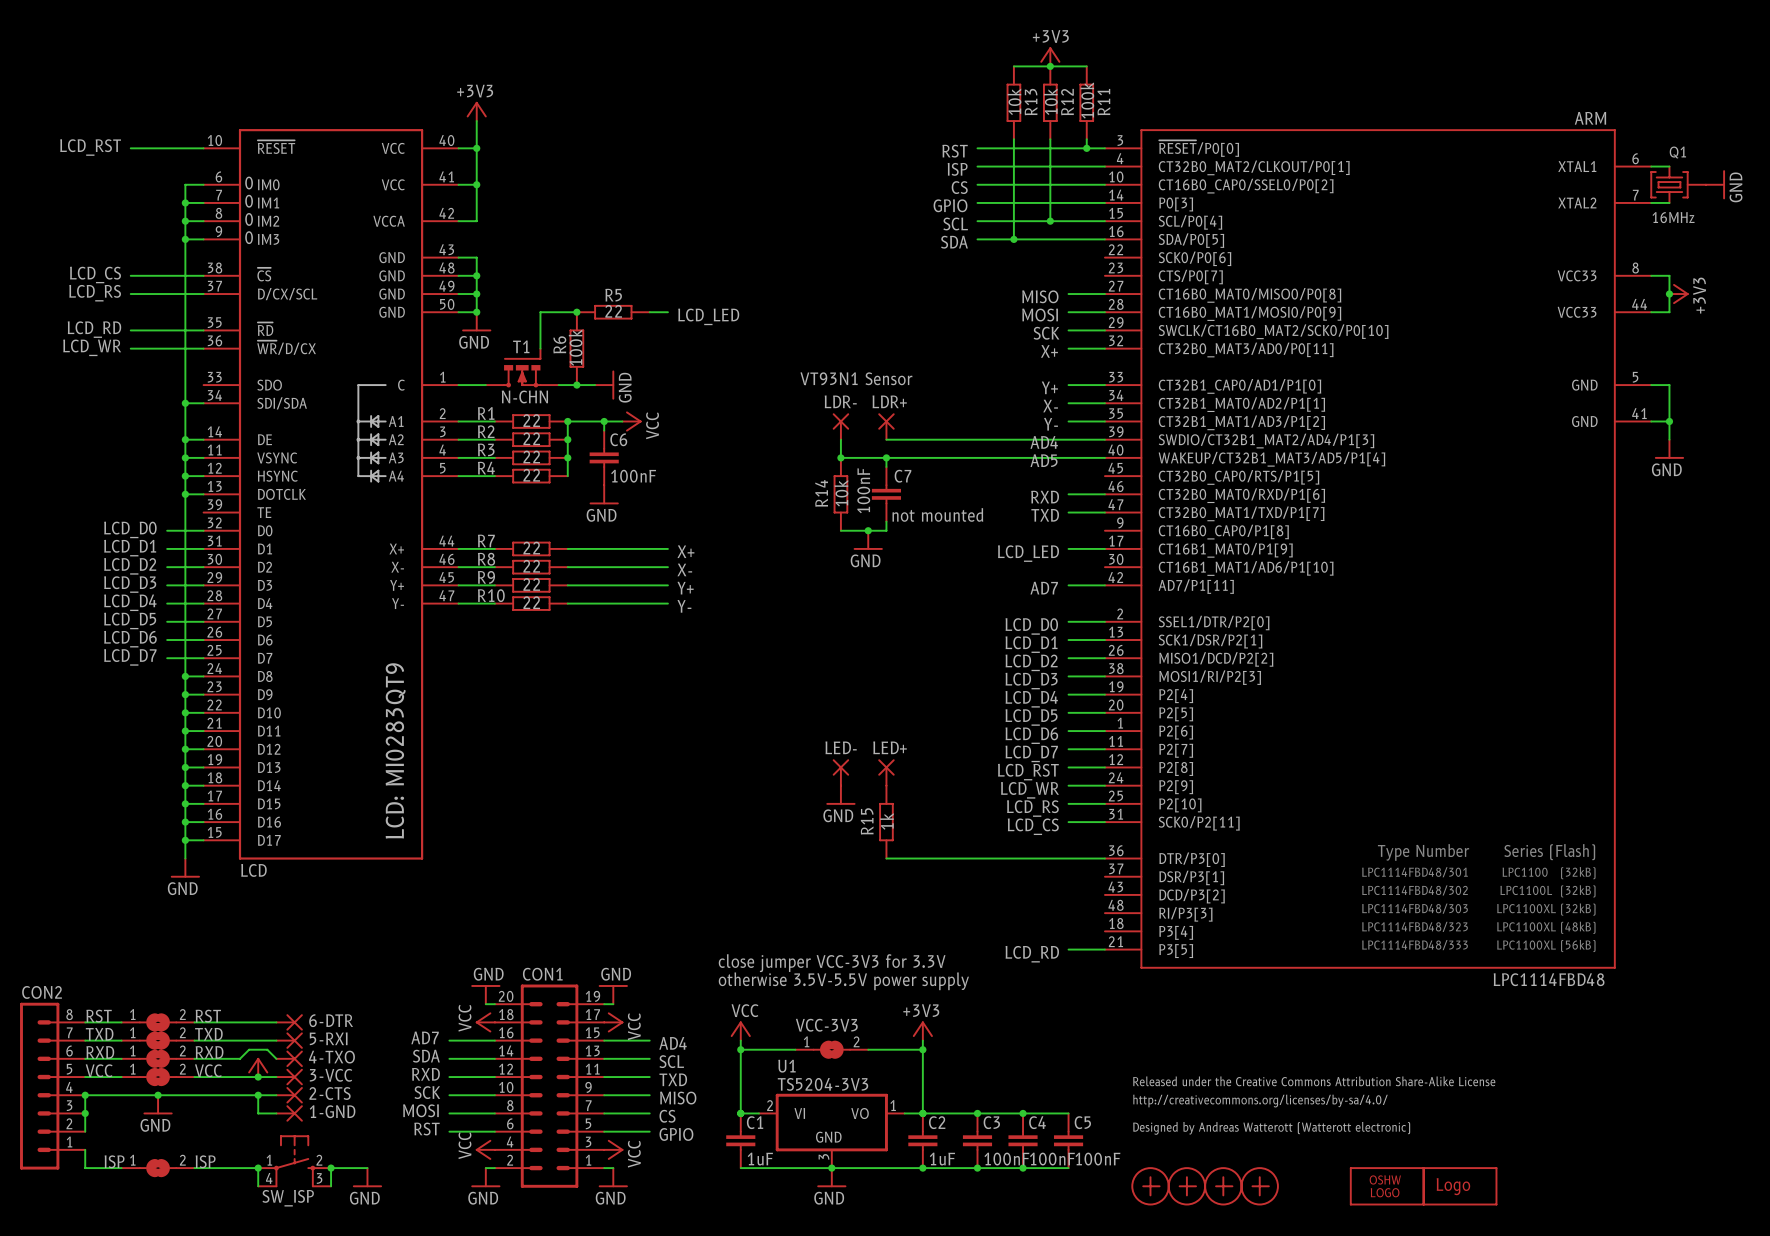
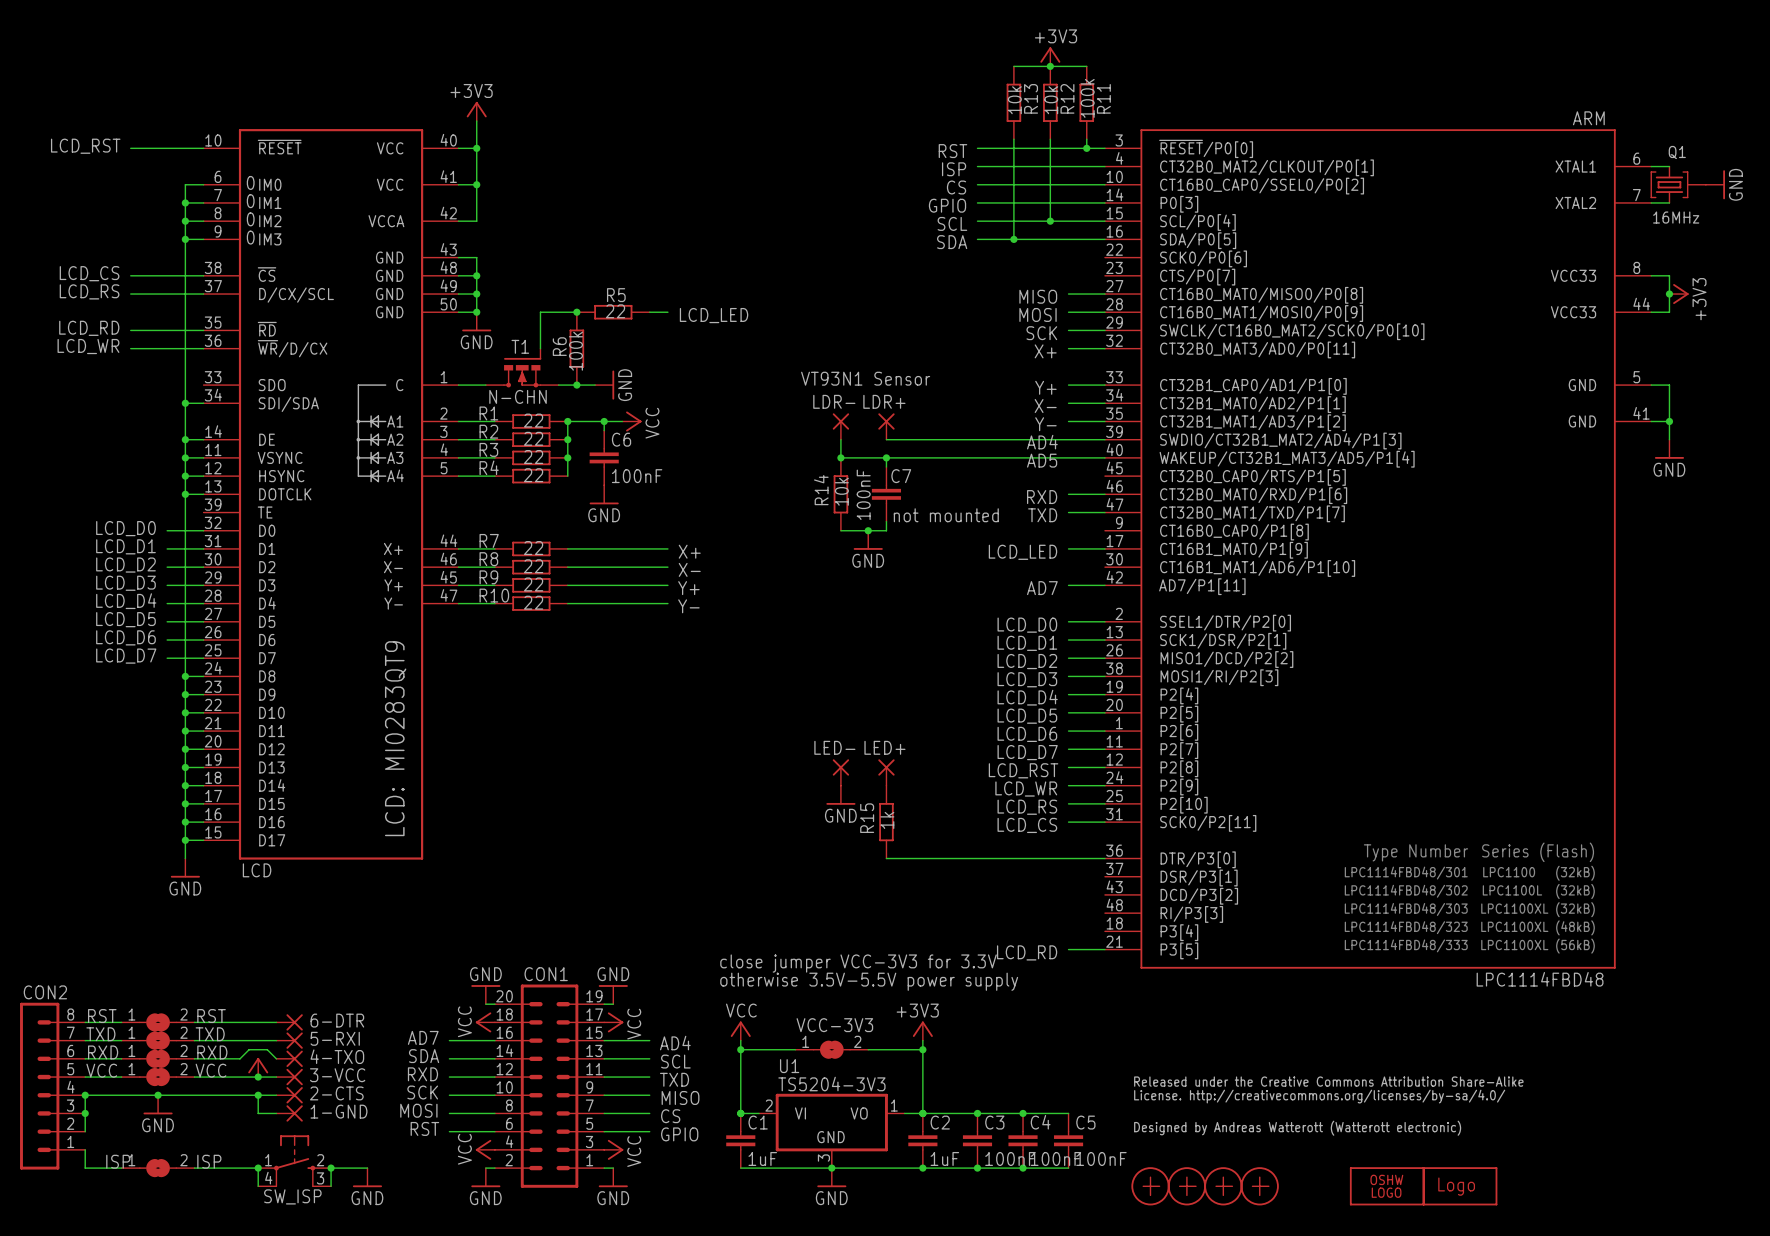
text: Released under the Creative Commons Attribution Share-Alike License (1314, 1081) -> License. http://creativecommons.org/licenses/by-sa/4.0/ (1319, 1096)
text: http://creativecommons.org/licenses/by-sa/4.0/ (1260, 1101) -> none

